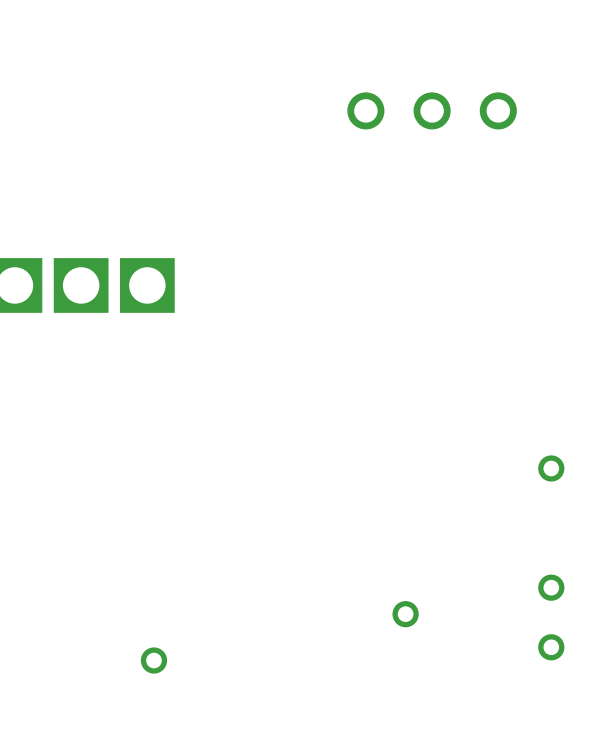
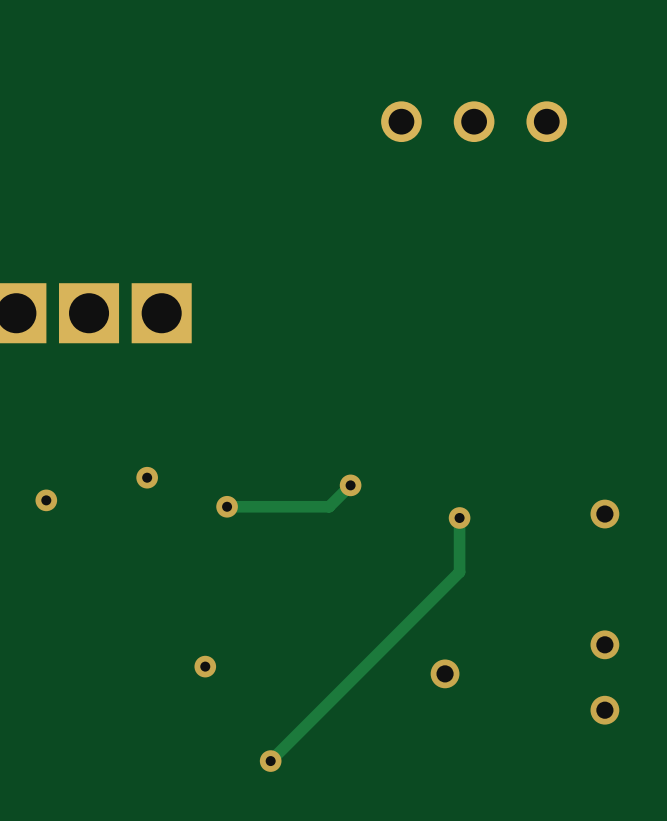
via: none -> (147, 477)
track: none -> (350, 485) (329, 506) (227, 506)
via: none -> (350, 485)
via: none -> (46, 500)
via: none -> (227, 506)
track: none -> (459, 517) (459, 572) (270, 761)
via: none -> (459, 517)
via: none -> (205, 666)
via: (153, 660) -> none
via: none -> (270, 761)

